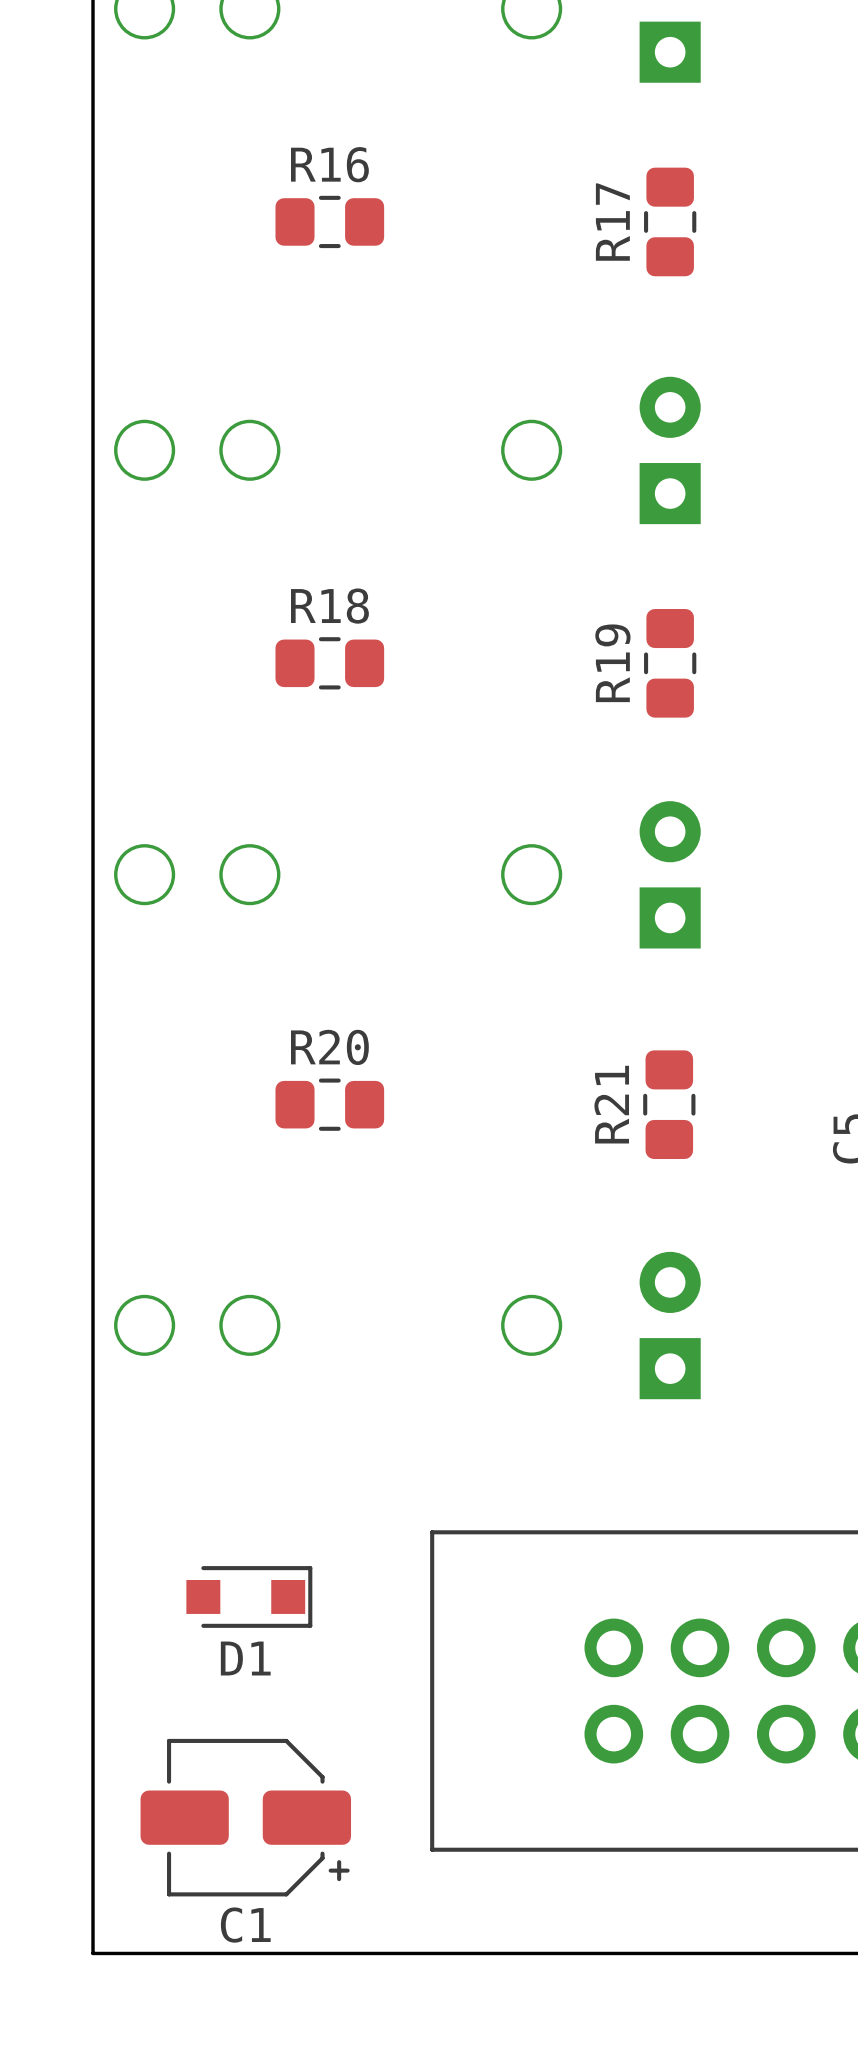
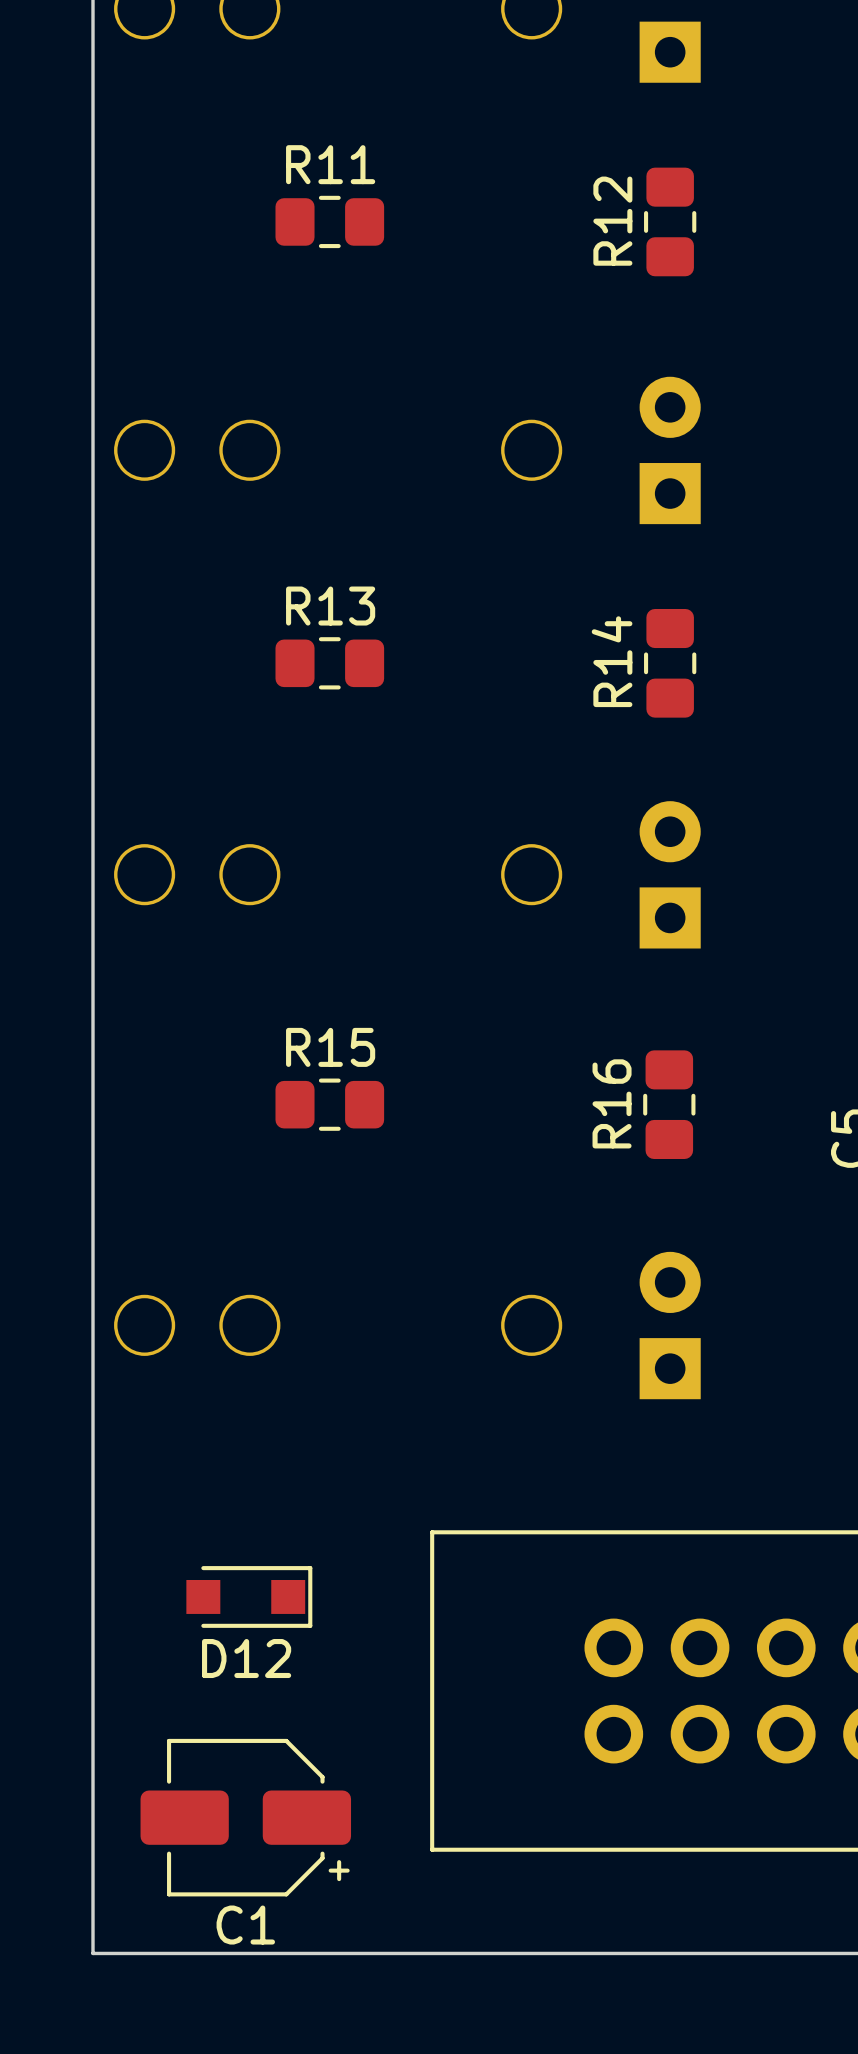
R16 name: R16 (329, 164) -> R11 (330, 164)
R17 name: R17 (612, 222) -> R12 (612, 221)
R18 name: R18 (329, 606) -> R13 (330, 606)
R19 name: R19 (612, 663) -> R14 (612, 661)
R20 name: R20 (329, 1047) -> R15 (330, 1047)
R21 name: R21 (611, 1104) -> R16 (612, 1103)
D1 name: D1 (245, 1658) -> D12 (246, 1658)

